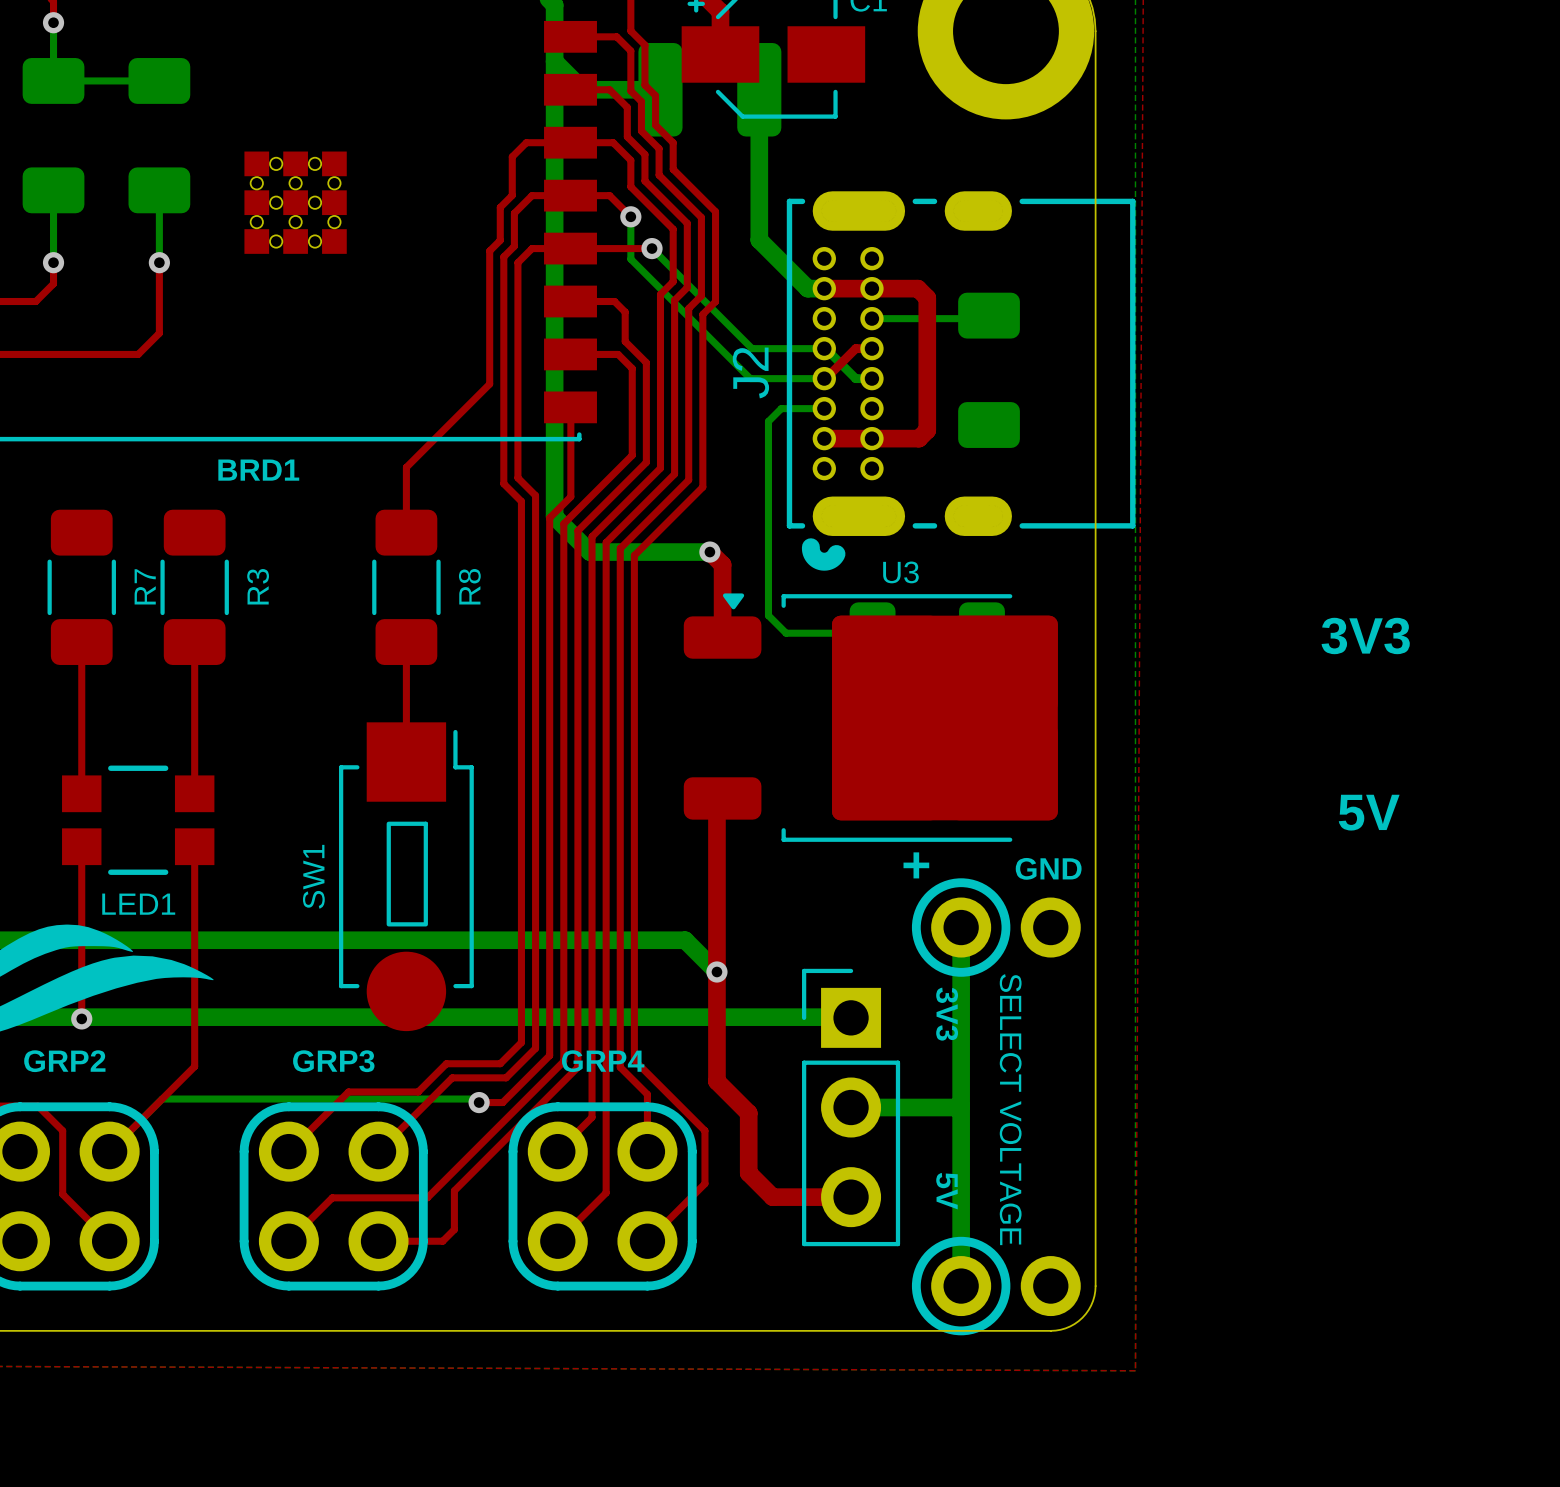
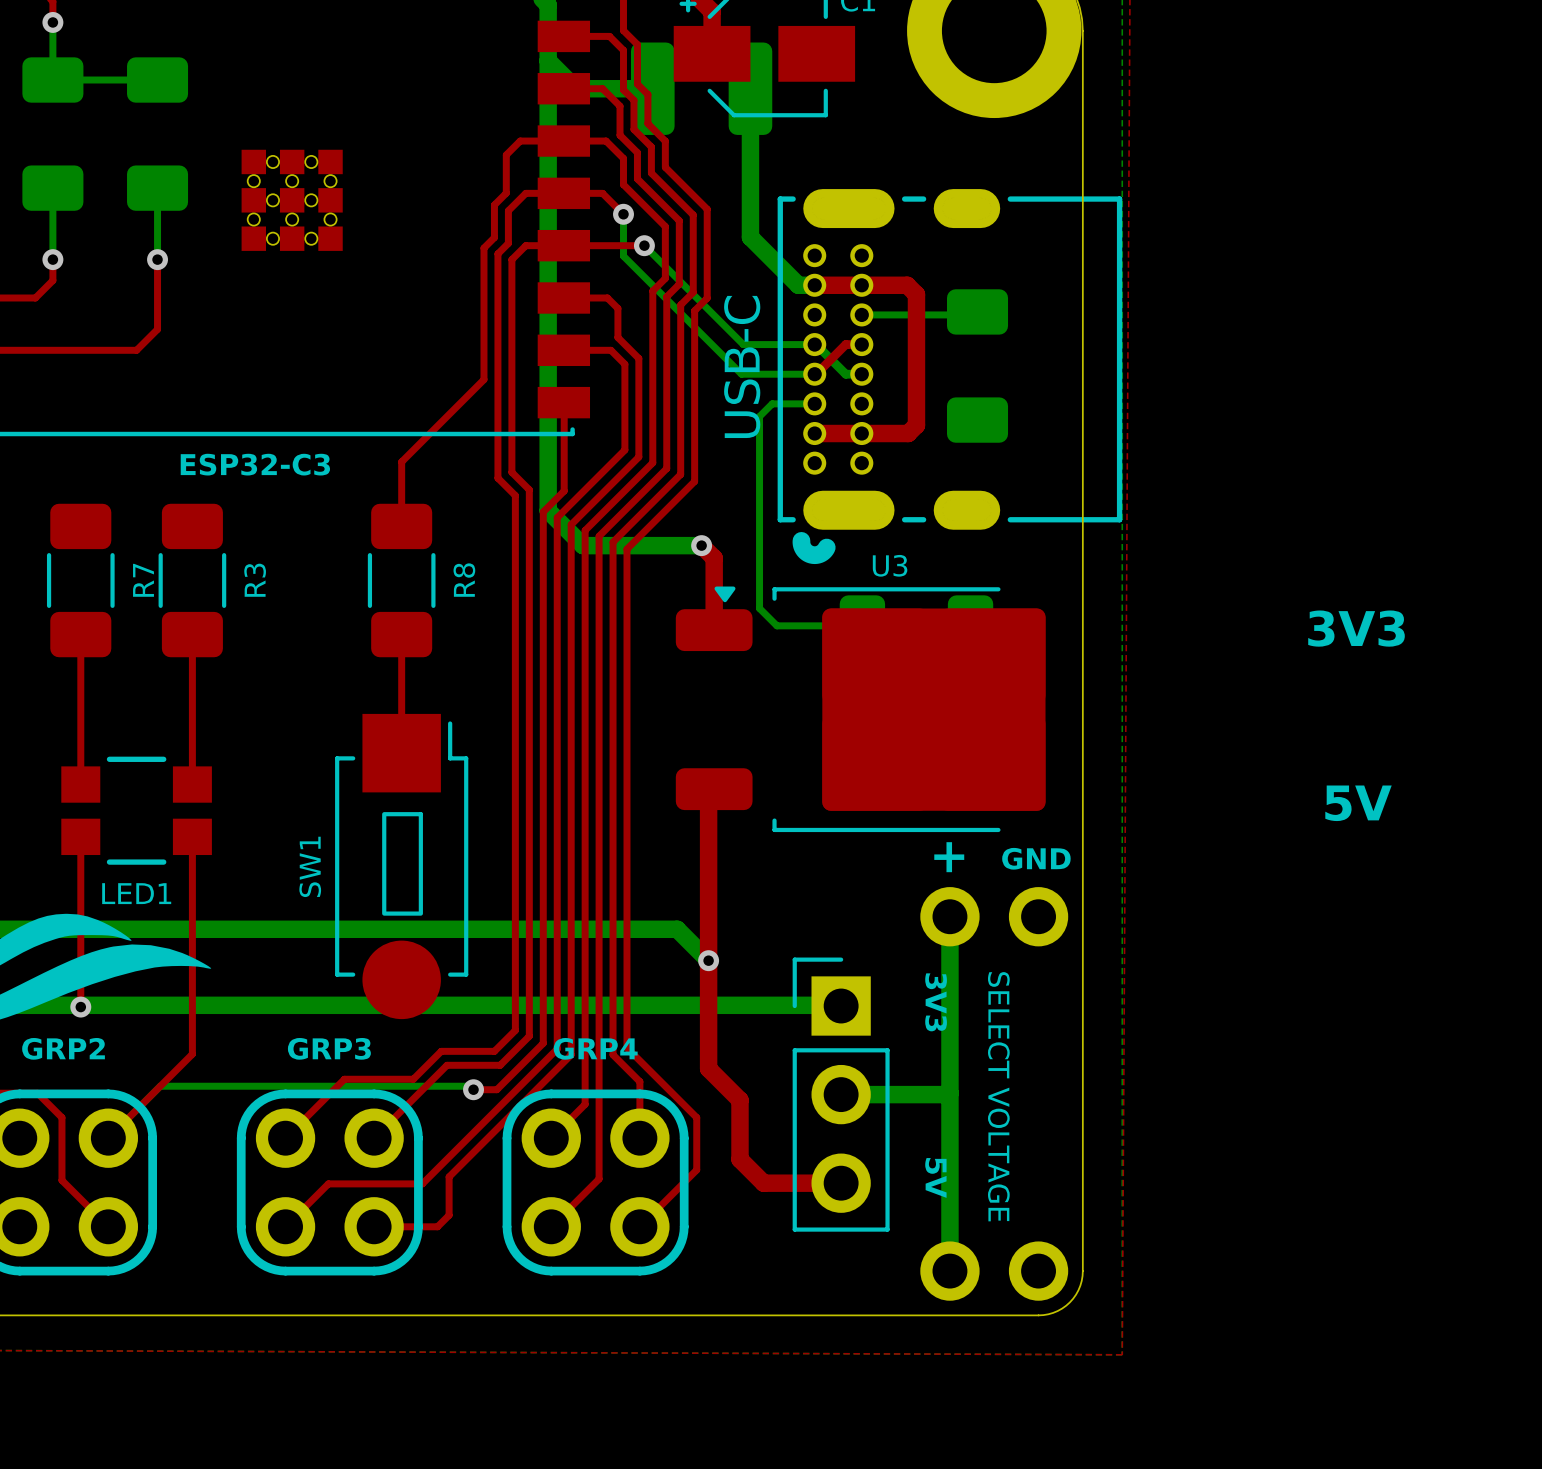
J2 name: J2 (750, 372) -> USB-C (742, 366)
BRD1 name: BRD1 (258, 470) -> ESP32-C3 (255, 464)
text position: + (916, 865) -> + (949, 857)
drawing: [911, 878, 1011, 977] -> none
drawing: [911, 1236, 1011, 1336] -> none

